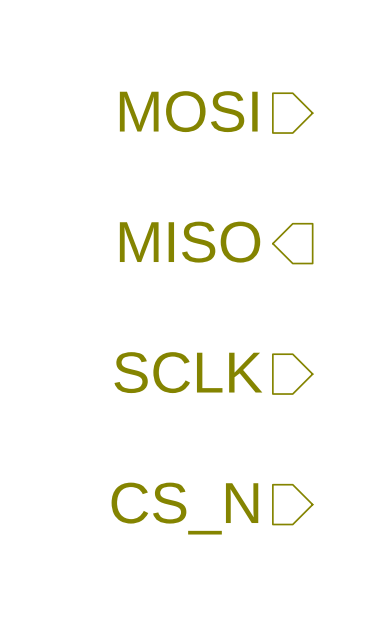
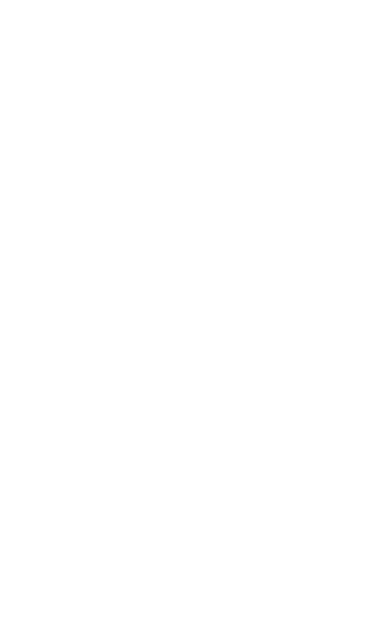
hierarchical label: MOSI (188, 111) -> none
hierarchical label: MISO (190, 242) -> none
hierarchical label: SCLK (188, 372) -> none
hierarchical label: CS_N (184, 508) -> none

